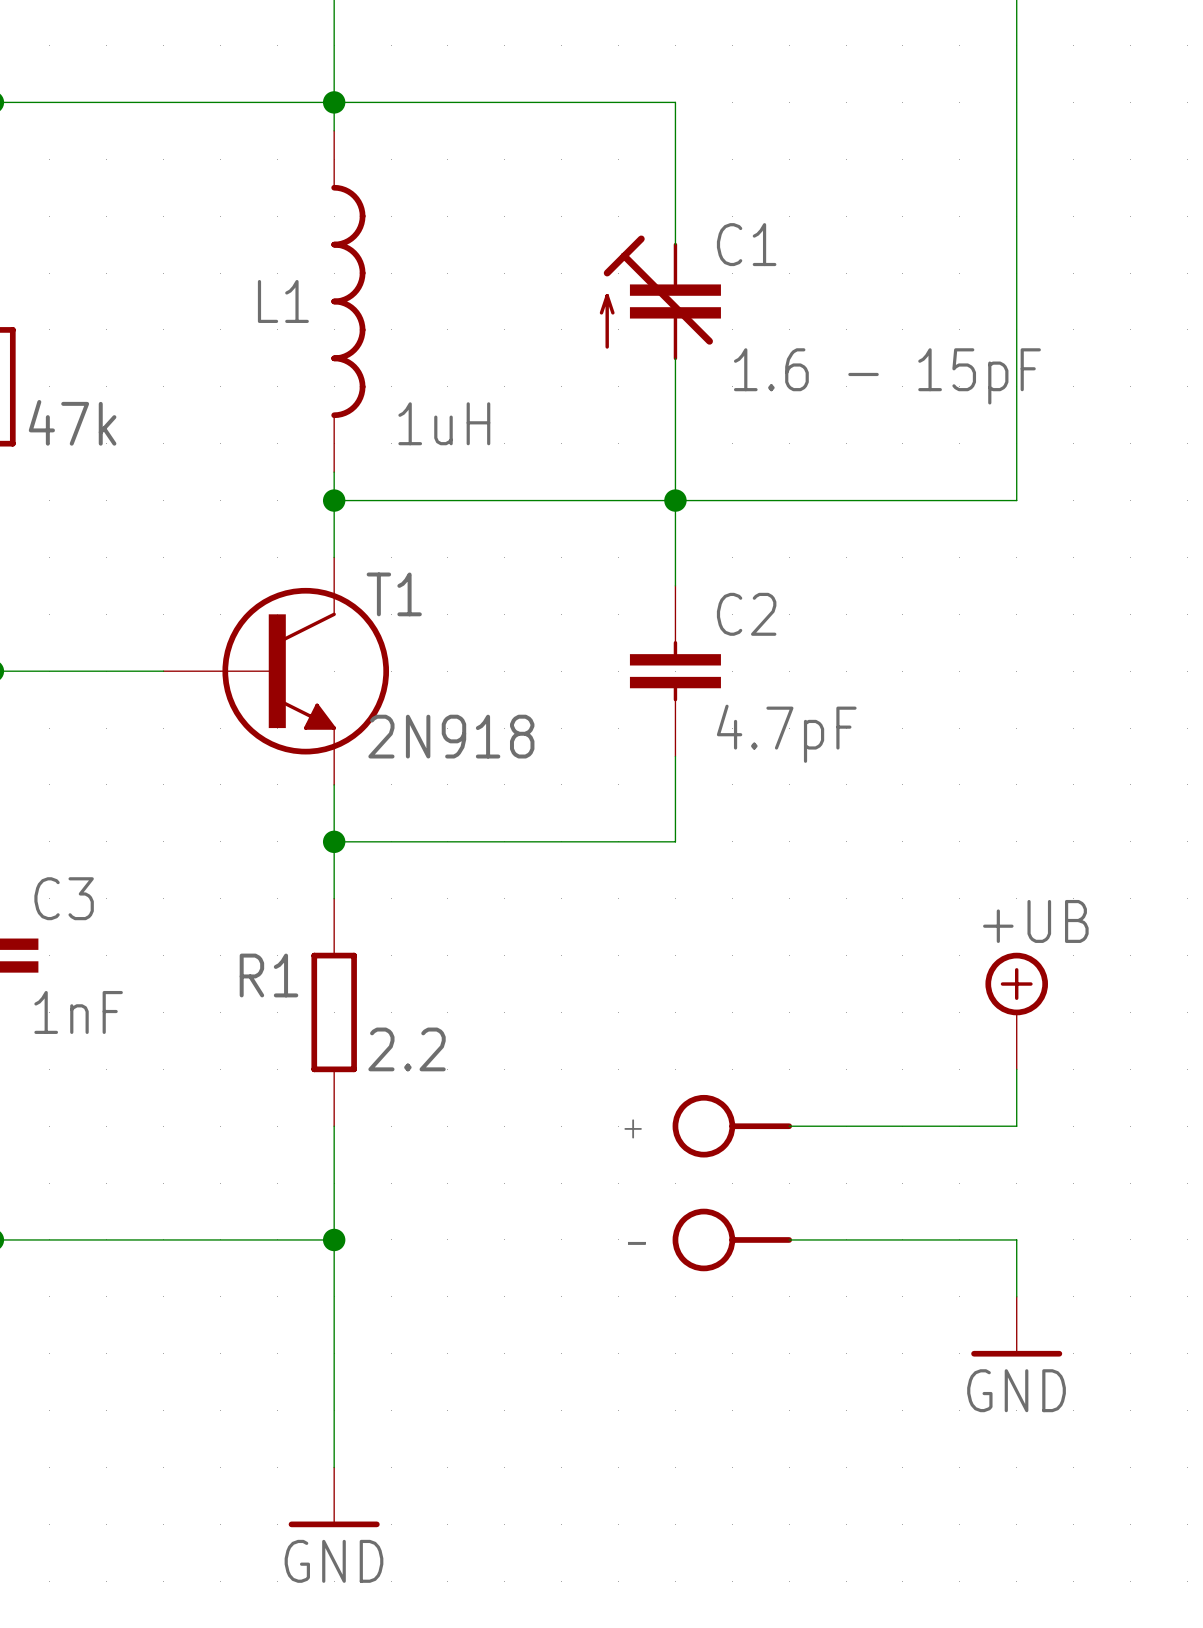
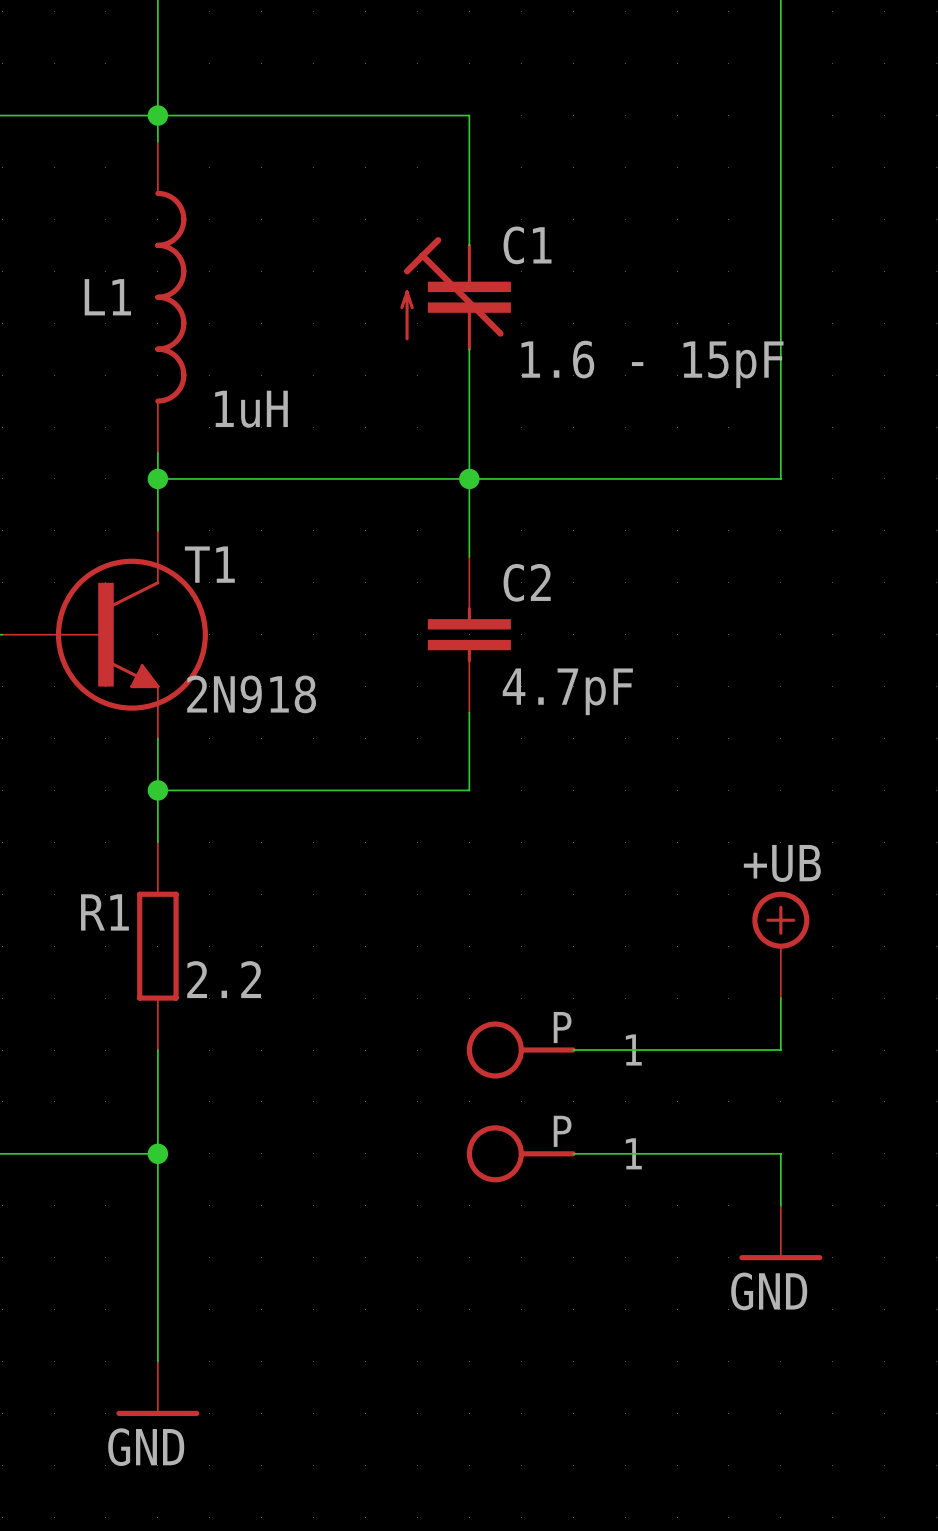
part pin number: none -> P (562, 1027)
part pin name: none -> 1 (633, 1050)
part name: + (633, 1128) -> none
part pin number: none -> P (562, 1131)
part pin name: none -> 1 (633, 1153)
part name: ̶̶ (636, 1243) -> none

